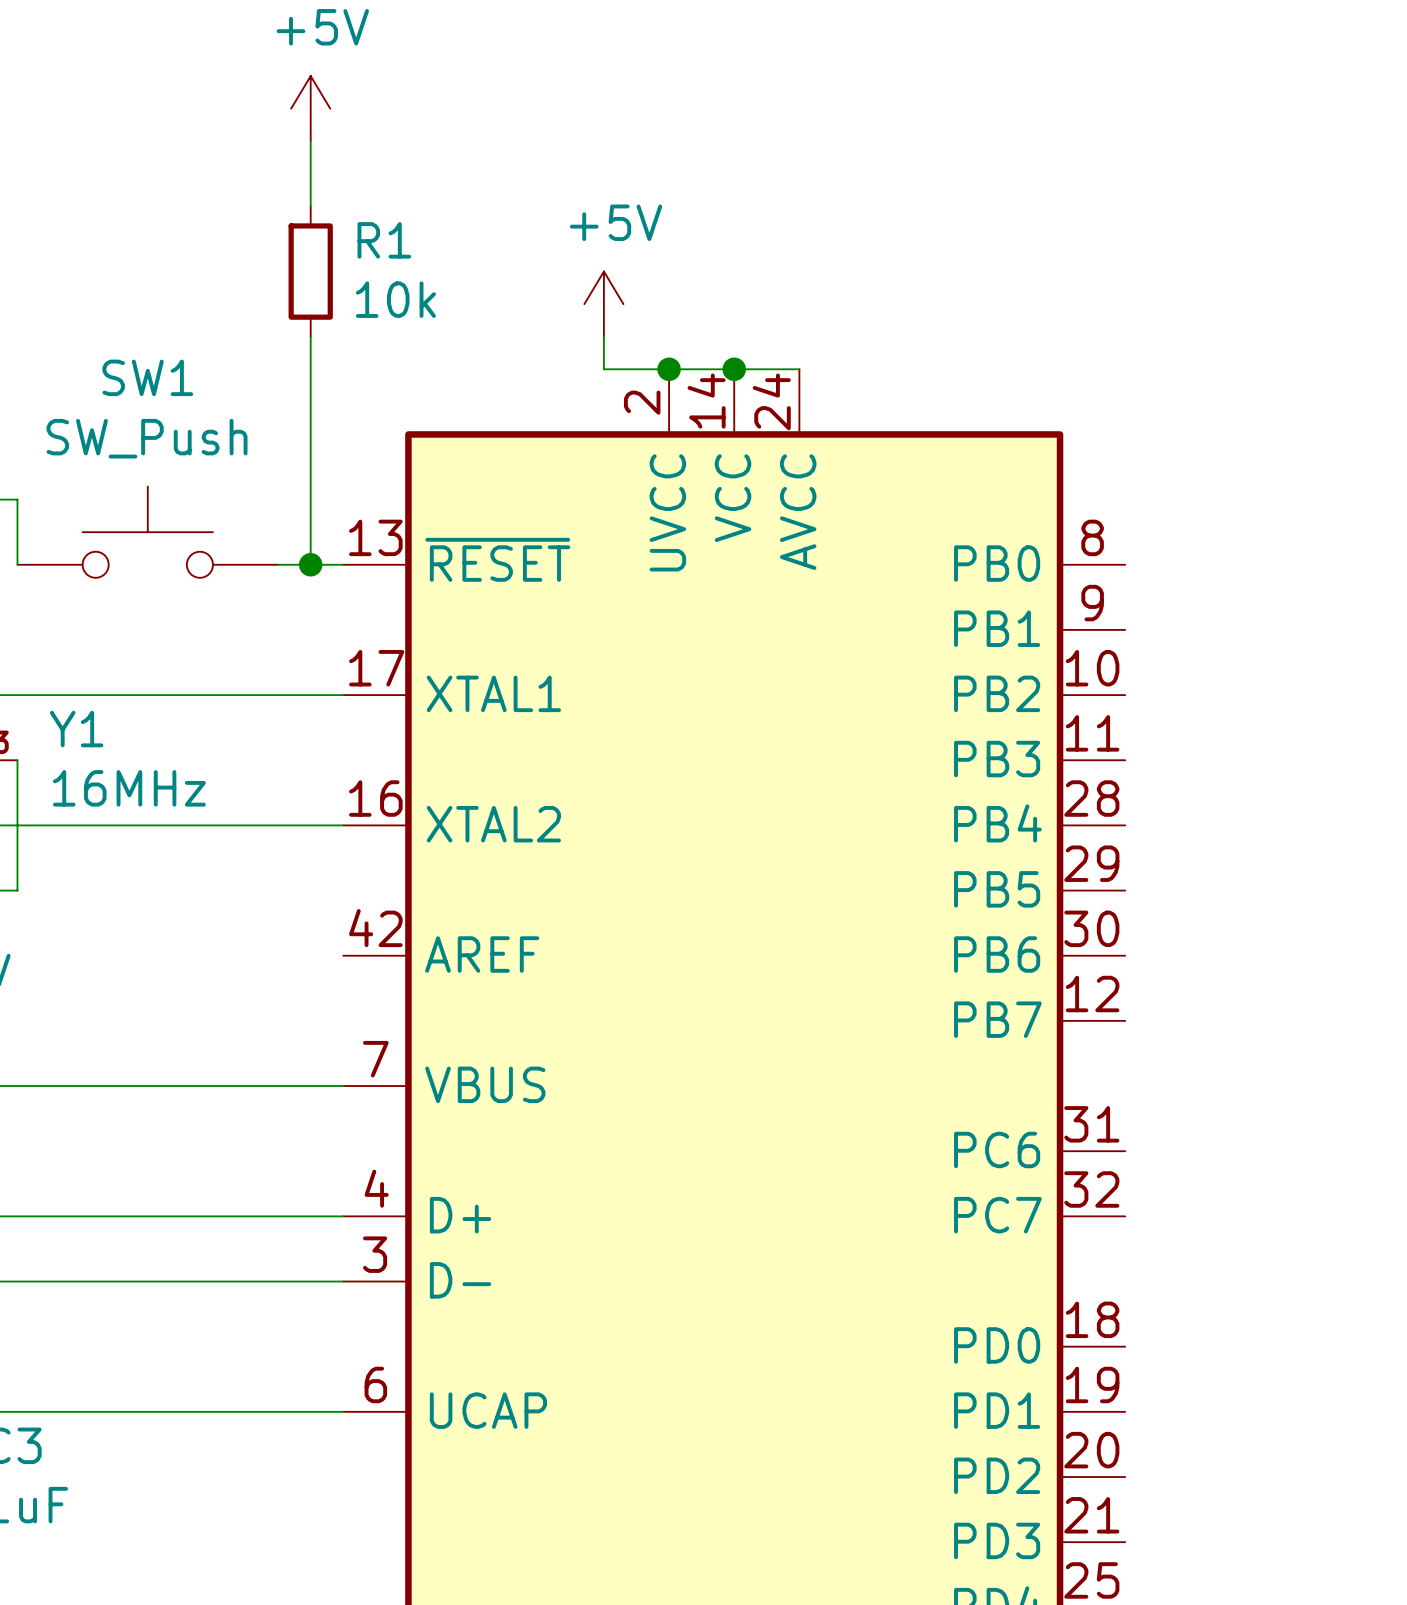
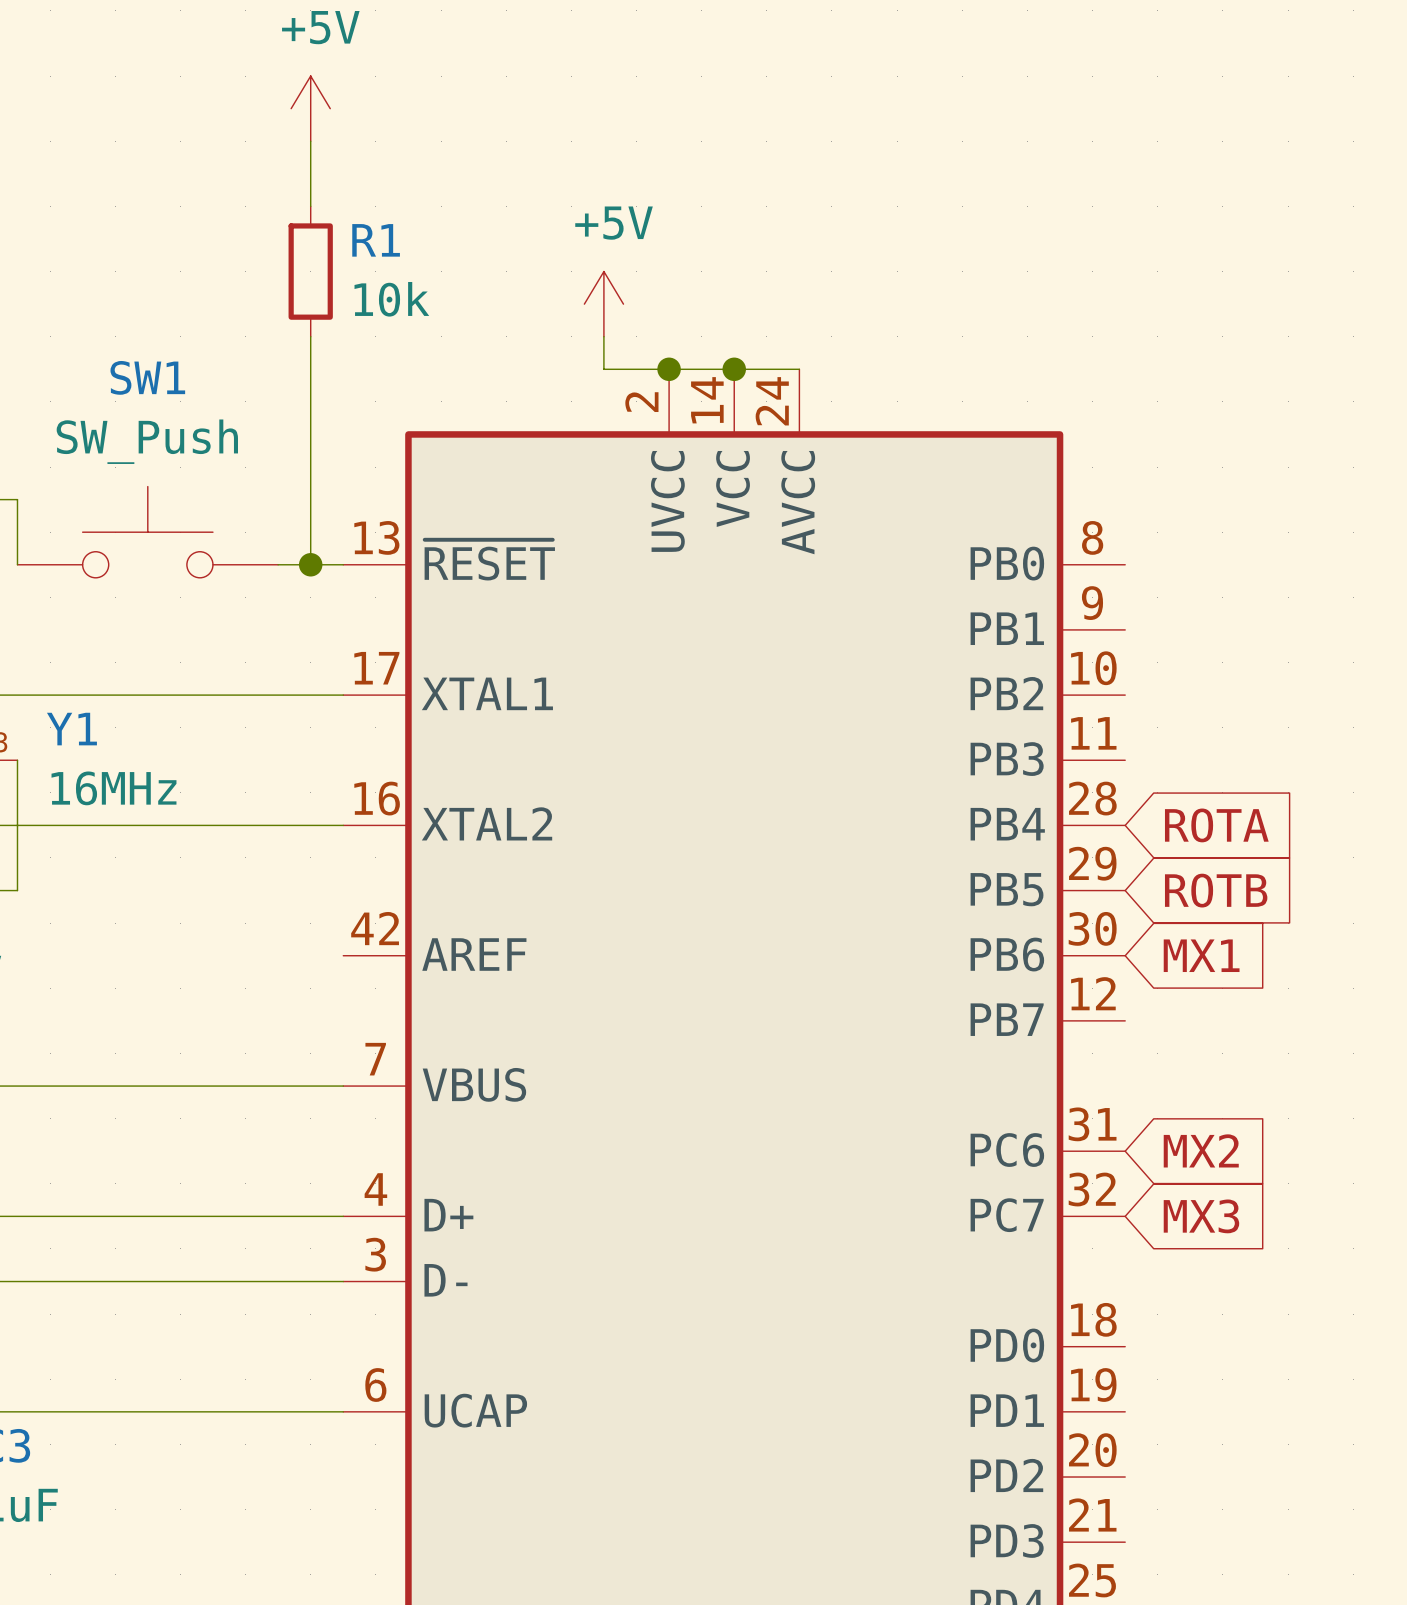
global label: none -> ROTA (1216, 825)
global label: none -> ROTB (1216, 890)
global label: none -> MX1 (1201, 955)
global label: none -> MX2 (1201, 1150)
global label: none -> MX3 (1201, 1216)

